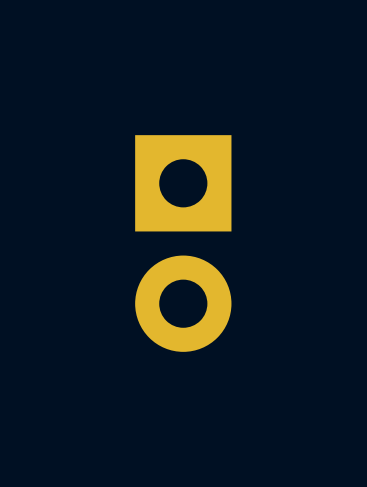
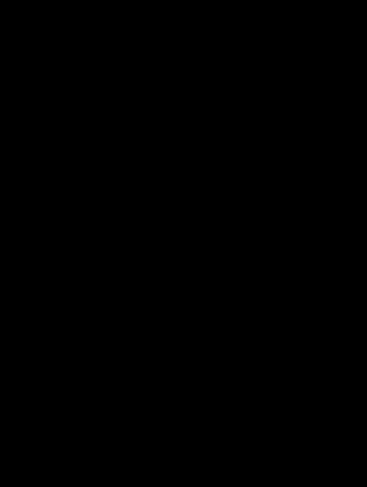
part: (183, 243) -> none

